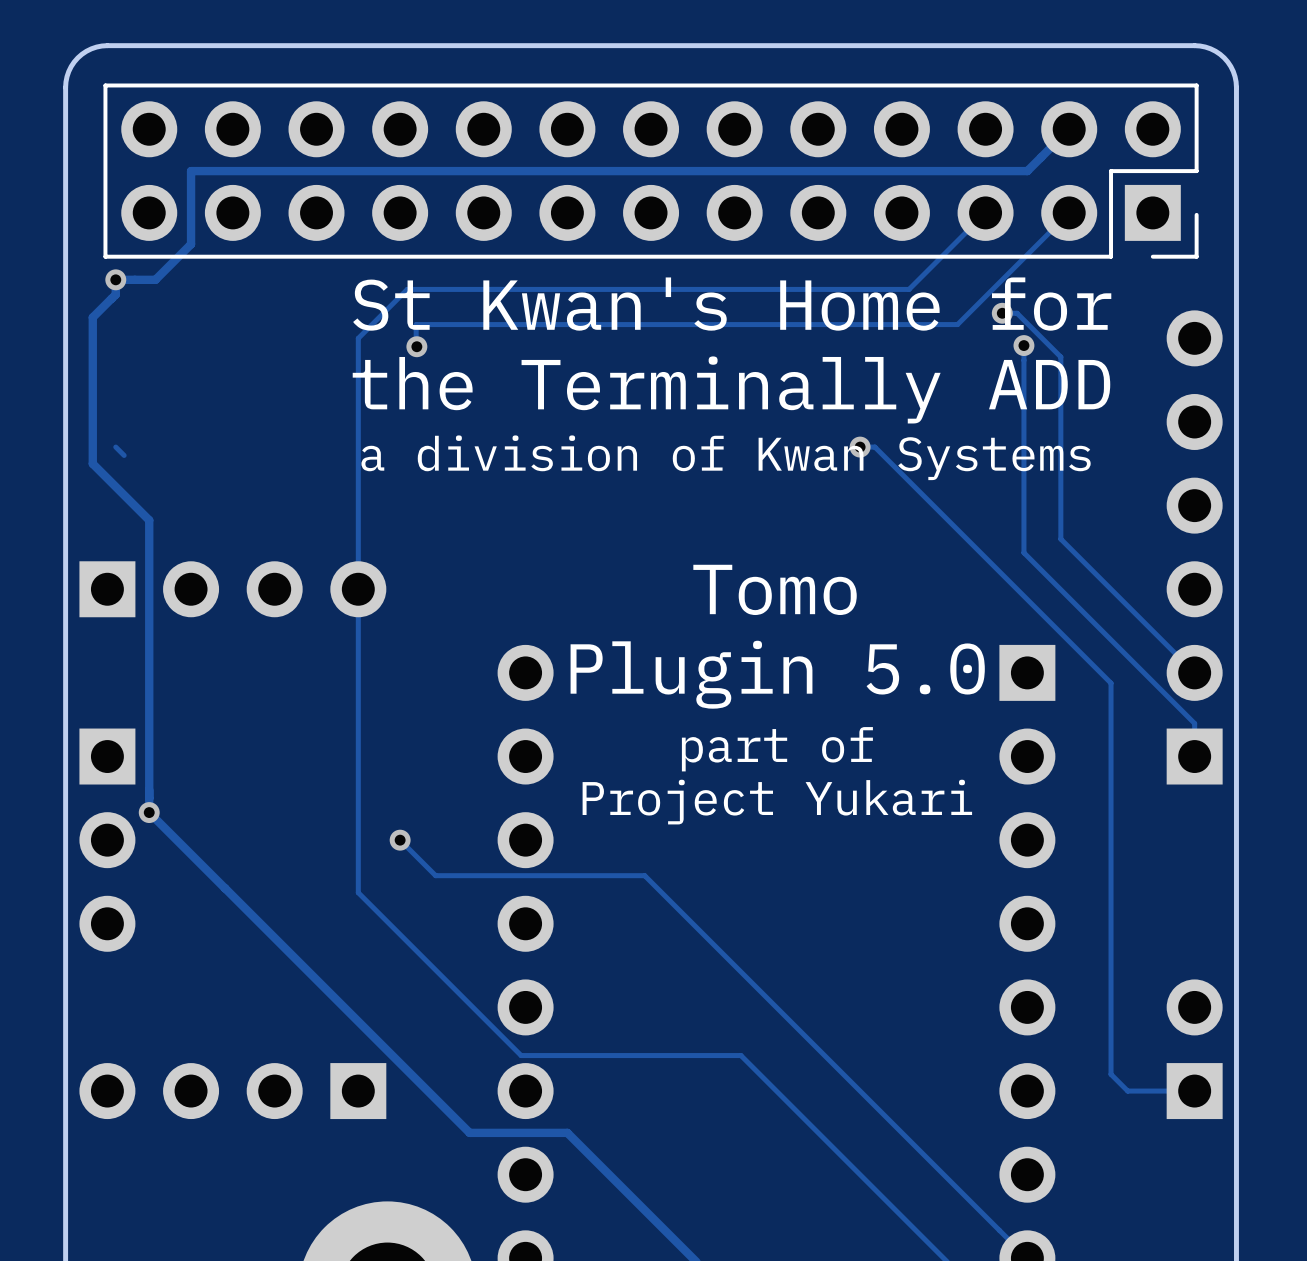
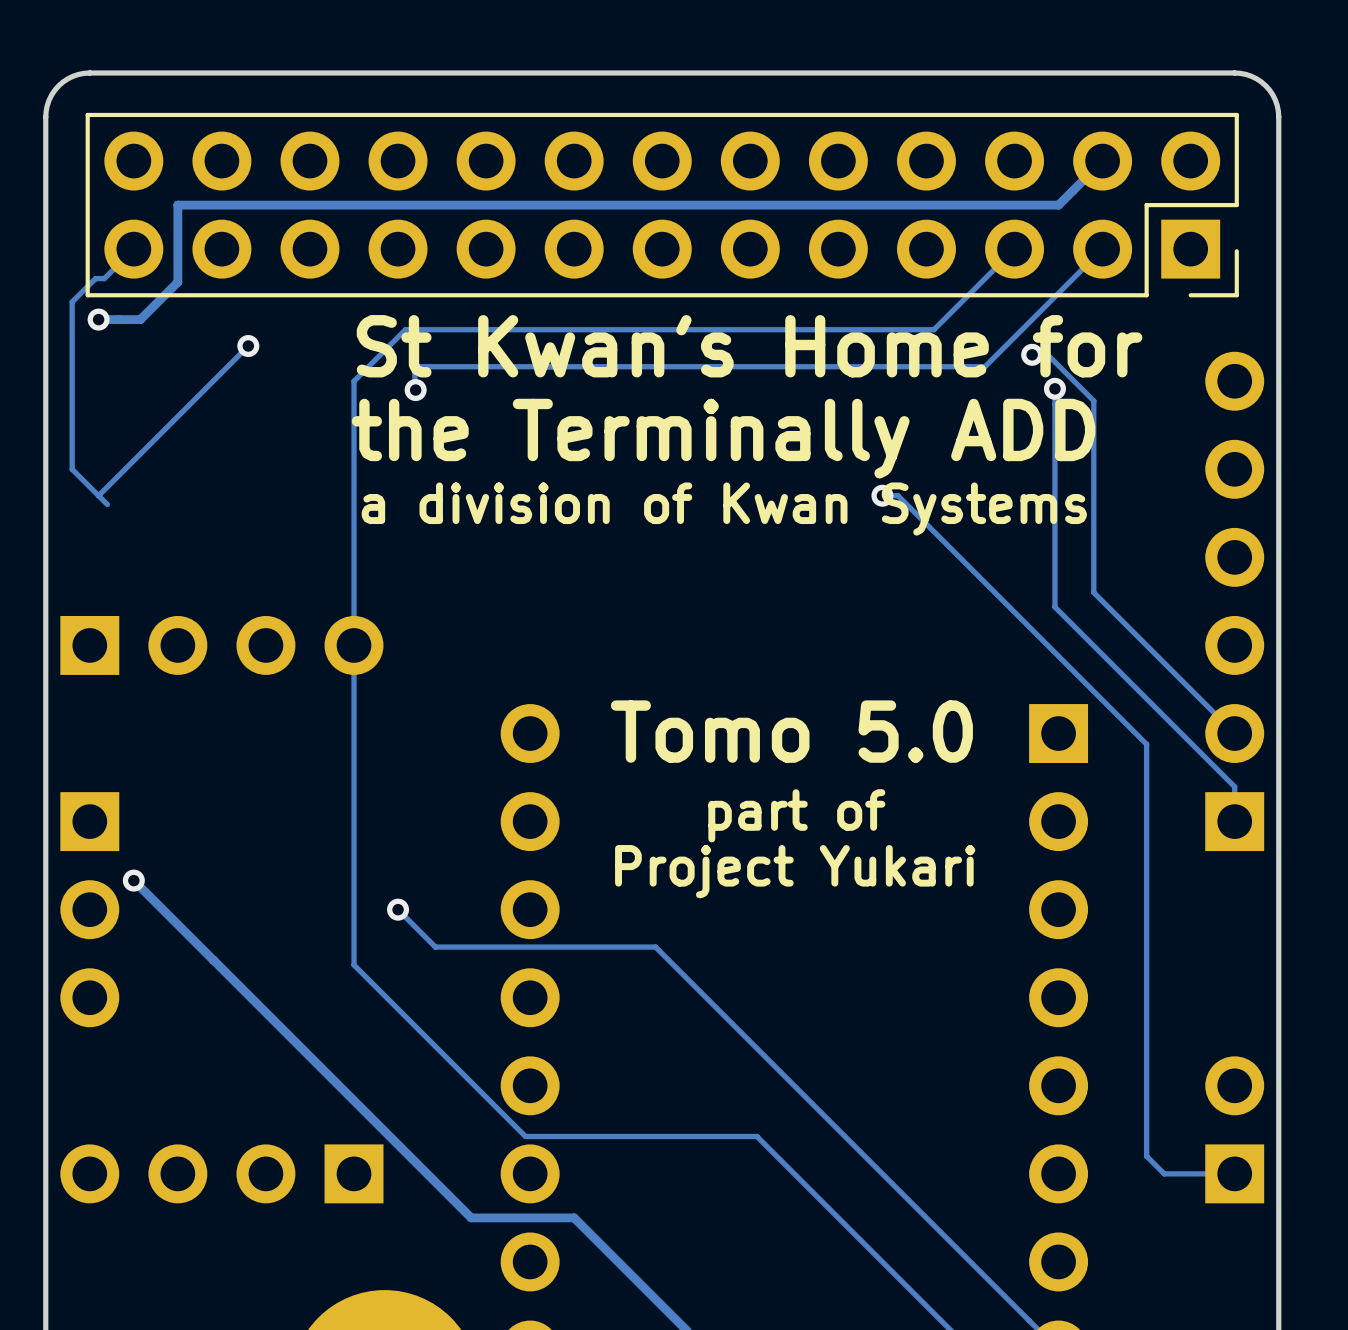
track: none -> (133, 249) (104, 278) (95, 278) (72, 301) (72, 469) (98, 495) (248, 346)
track: (115, 279) (115, 294) (92, 317) (92, 463) (149, 520) (149, 812) -> none
via: none -> (248, 346)
text: Tomo (775, 589) -> none
text: Plugin 5.0 (777, 674) -> Tomo 5.0 (791, 731)

